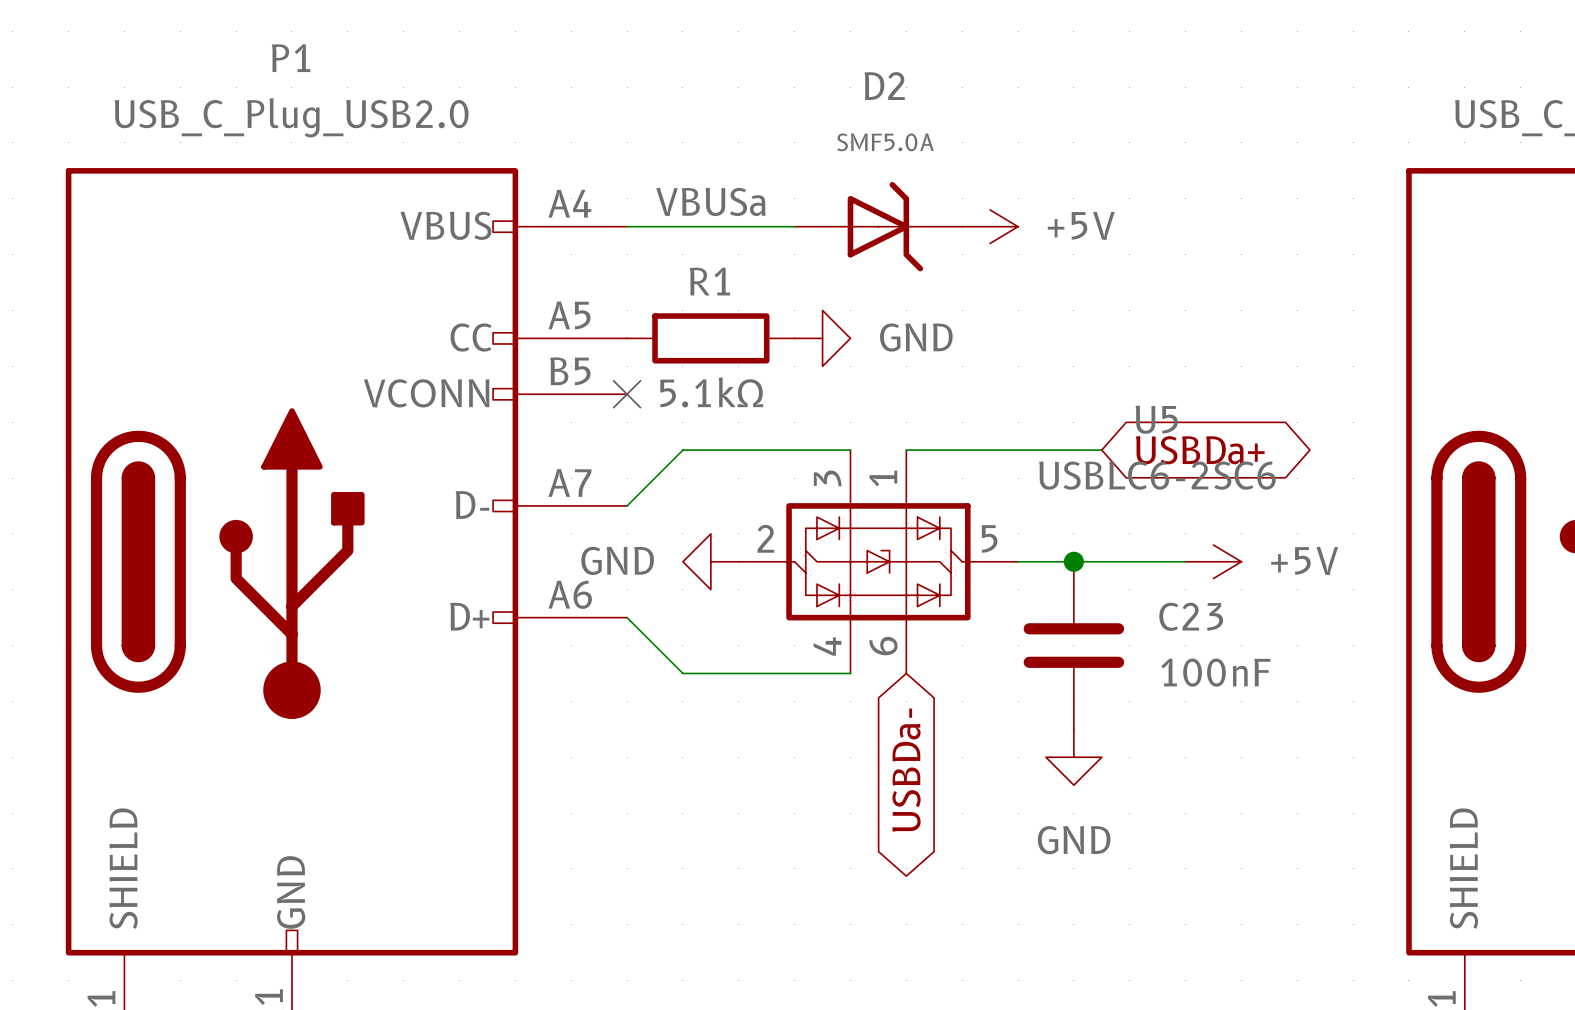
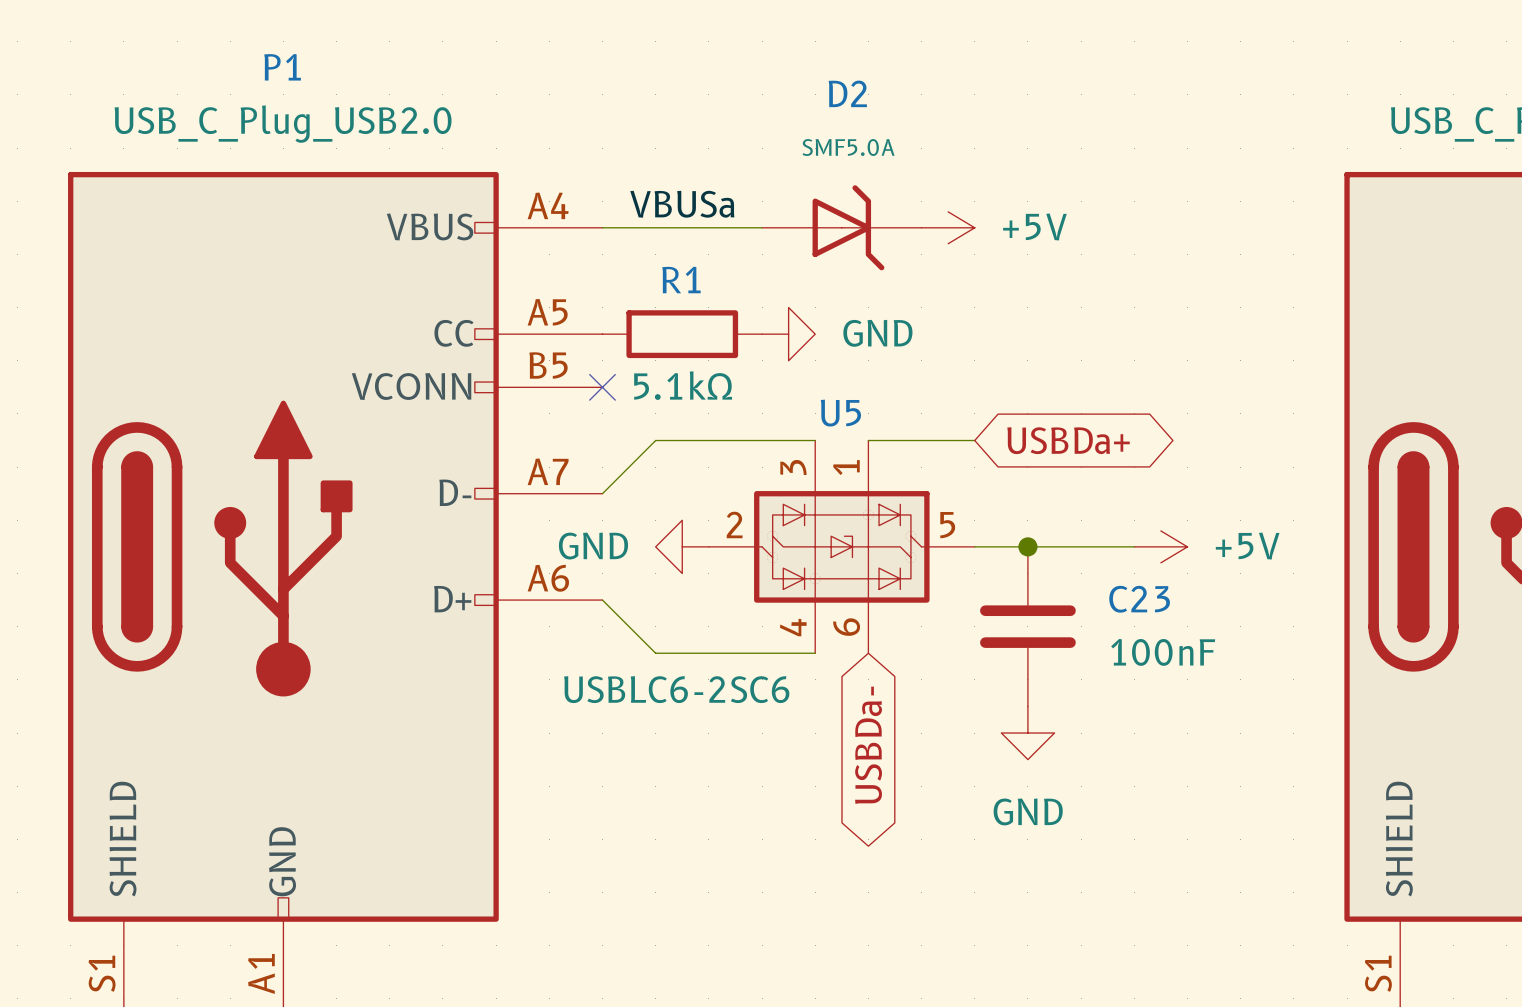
U5 name position: U5 (1156, 419) -> U5 (840, 413)
wire: (1018, 450) (1101, 450) -> none
global label position: USBDa+ (1200, 450) -> USBDa+ (1068, 440)
U5 value position: USBLC6-2SC6 (1157, 475) -> USBLC6-2SC6 (676, 689)

